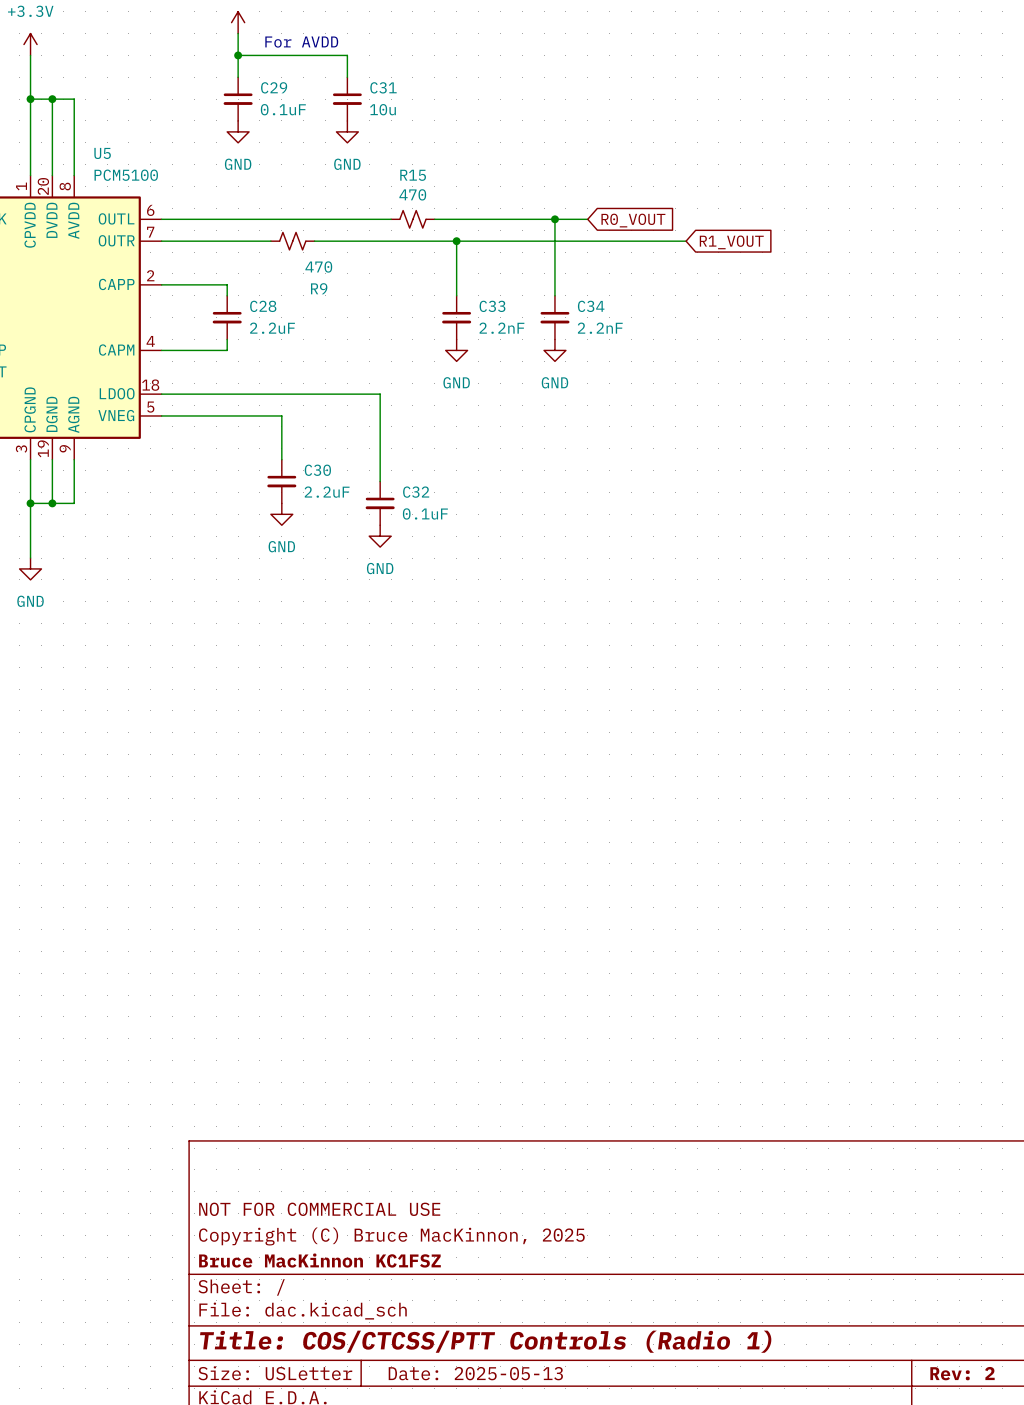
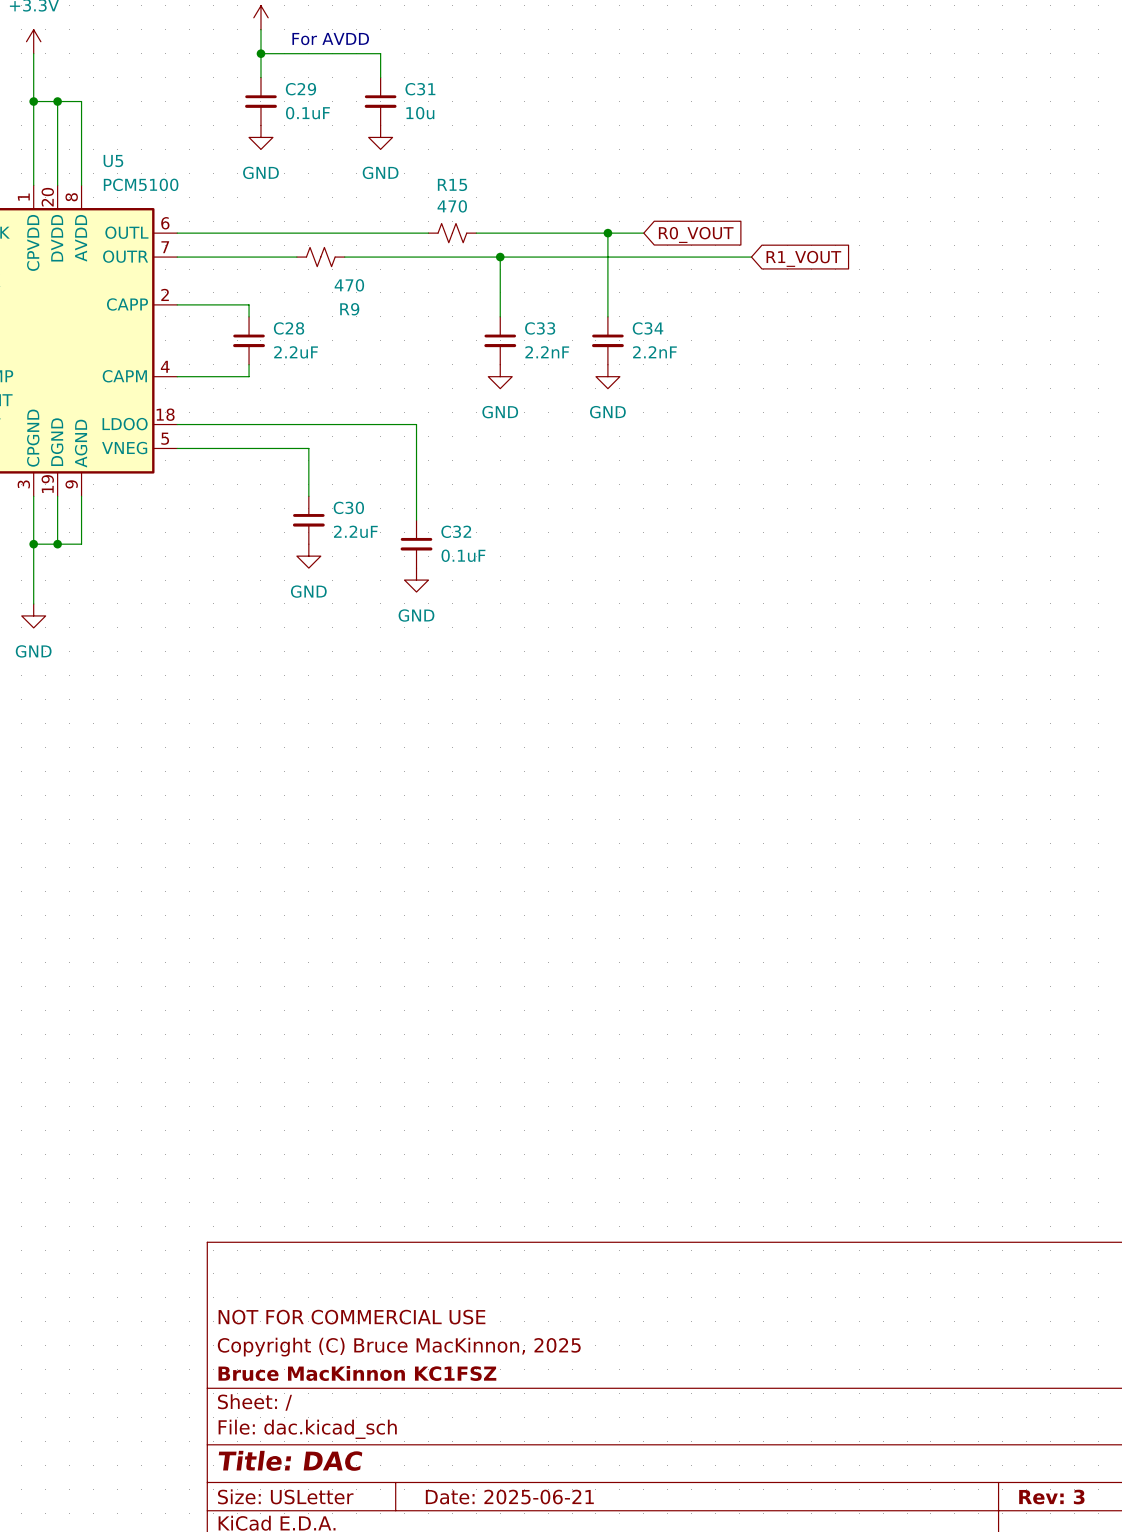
title block: Title: COS/CTCSS/PTT Controls (Radio 1) (485, 1341) -> Title: DAC (290, 1460)
title block: Date: 2025-05-13 (475, 1373) -> Date: 2025-06-21 (509, 1497)
title block: Rev: 2 (962, 1373) -> Rev: 3 (1051, 1497)

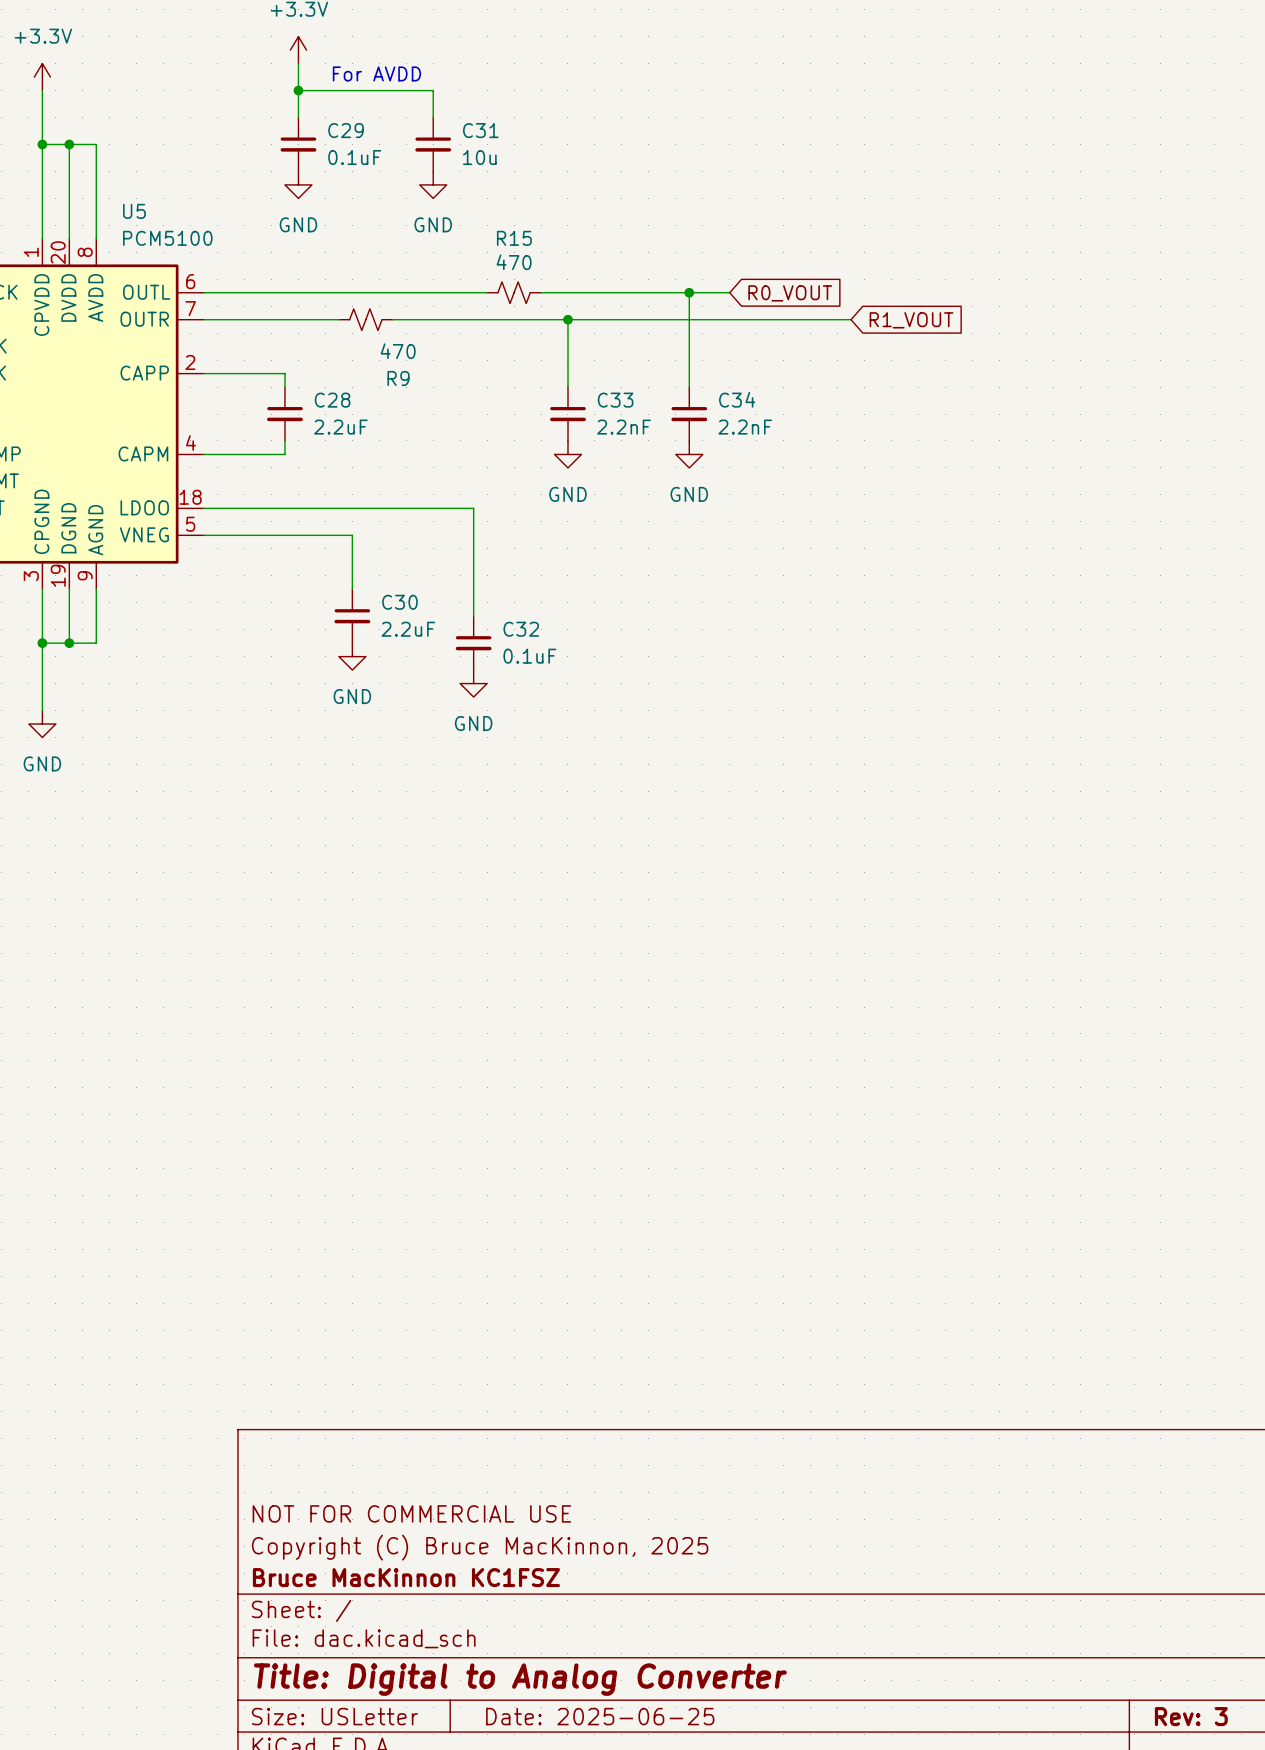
title block: Title: DAC (290, 1460) -> Title: Digital to Analog Converter (520, 1679)
title block: Date: 2025-06-21 (509, 1497) -> Date: 2025-06-25 (600, 1716)

